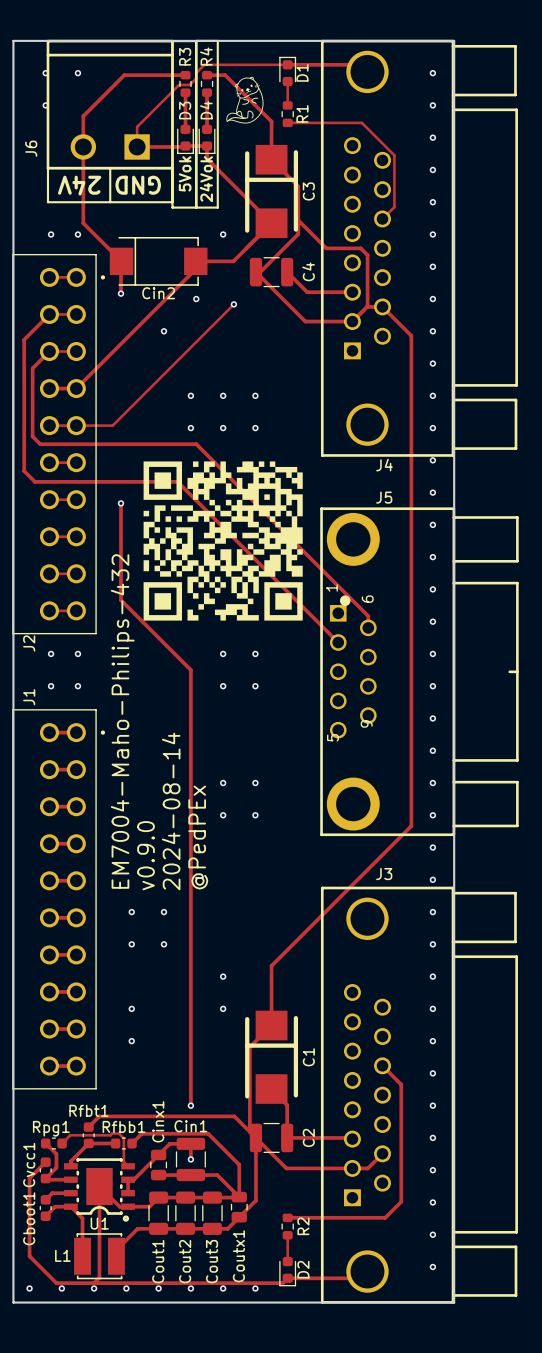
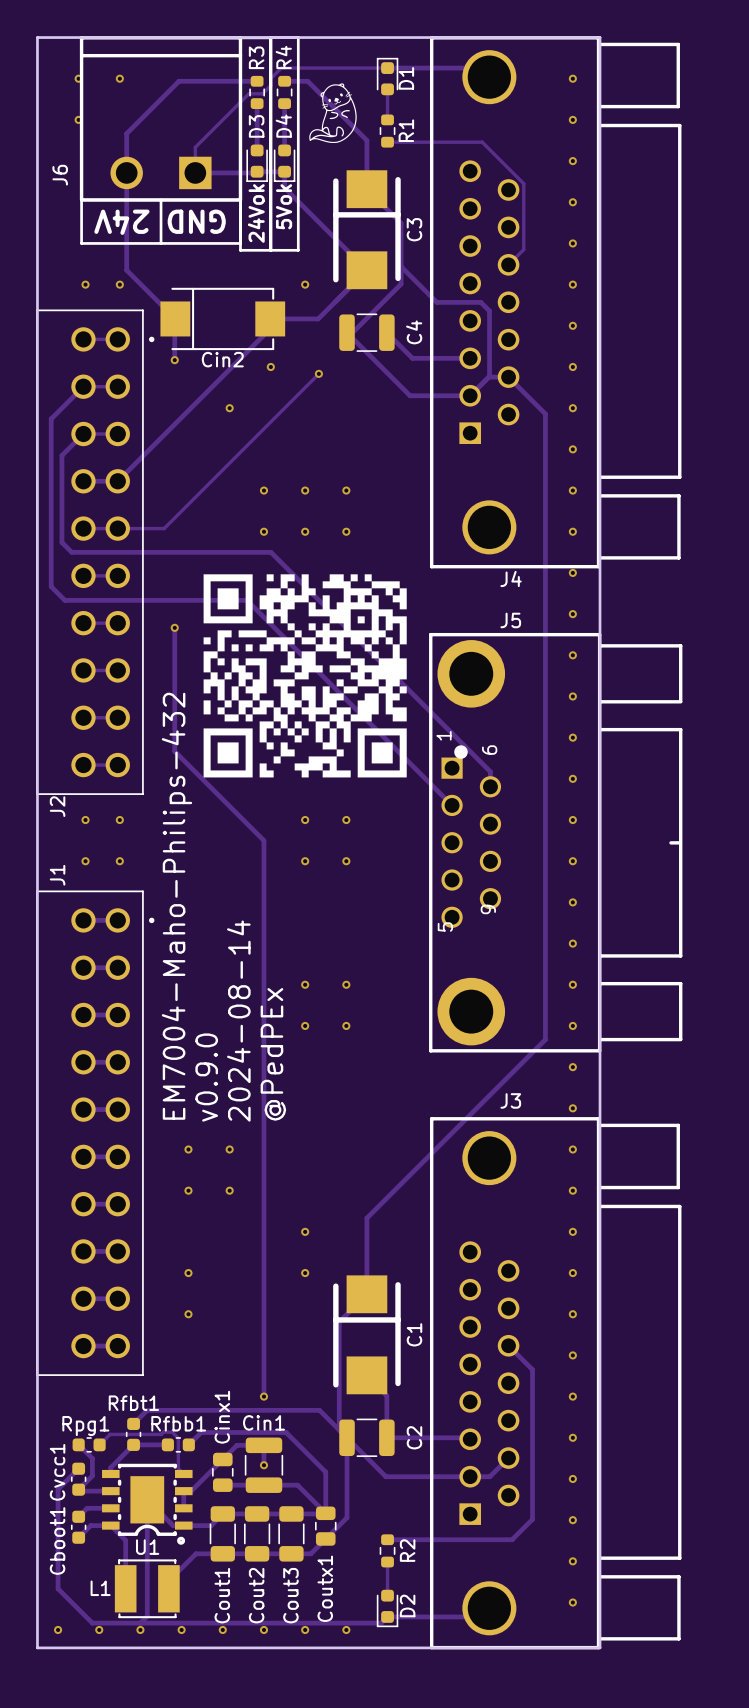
text: 5Vok (185, 173) -> 24Vok (256, 213)
text: 24Vok (206, 179) -> 5Vok (284, 206)

